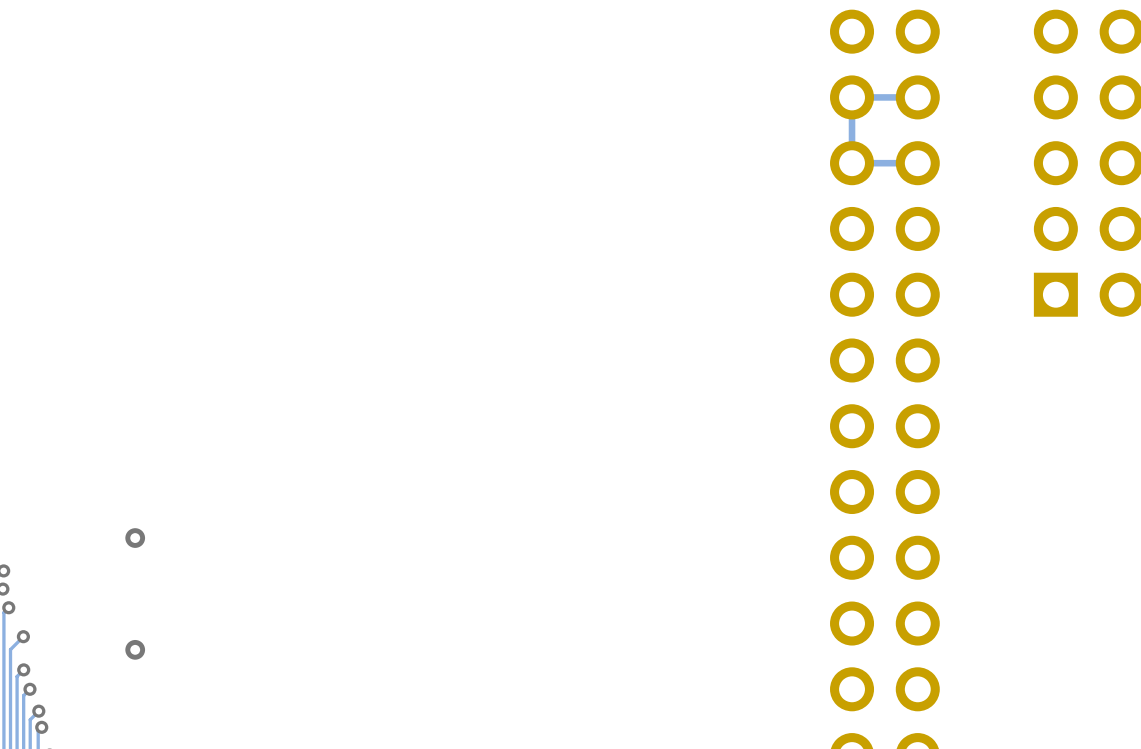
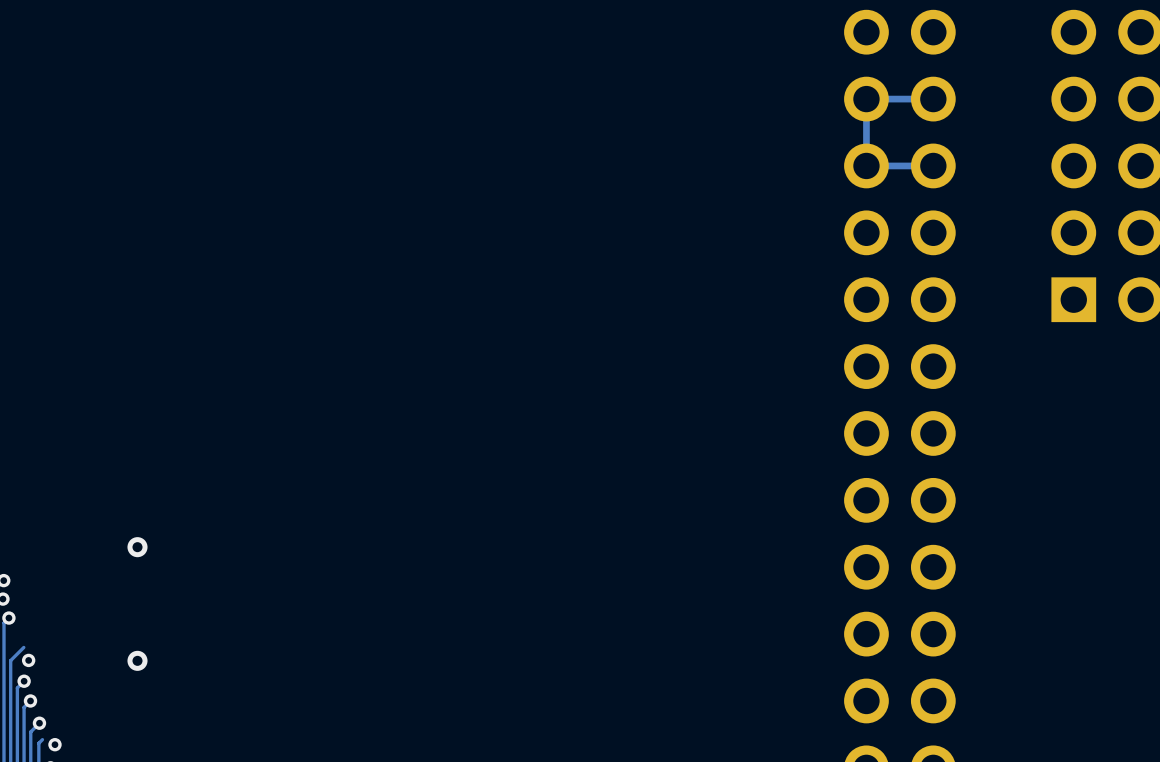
via position: (23, 636) -> (28, 660)
via position: (41, 727) -> (54, 744)

